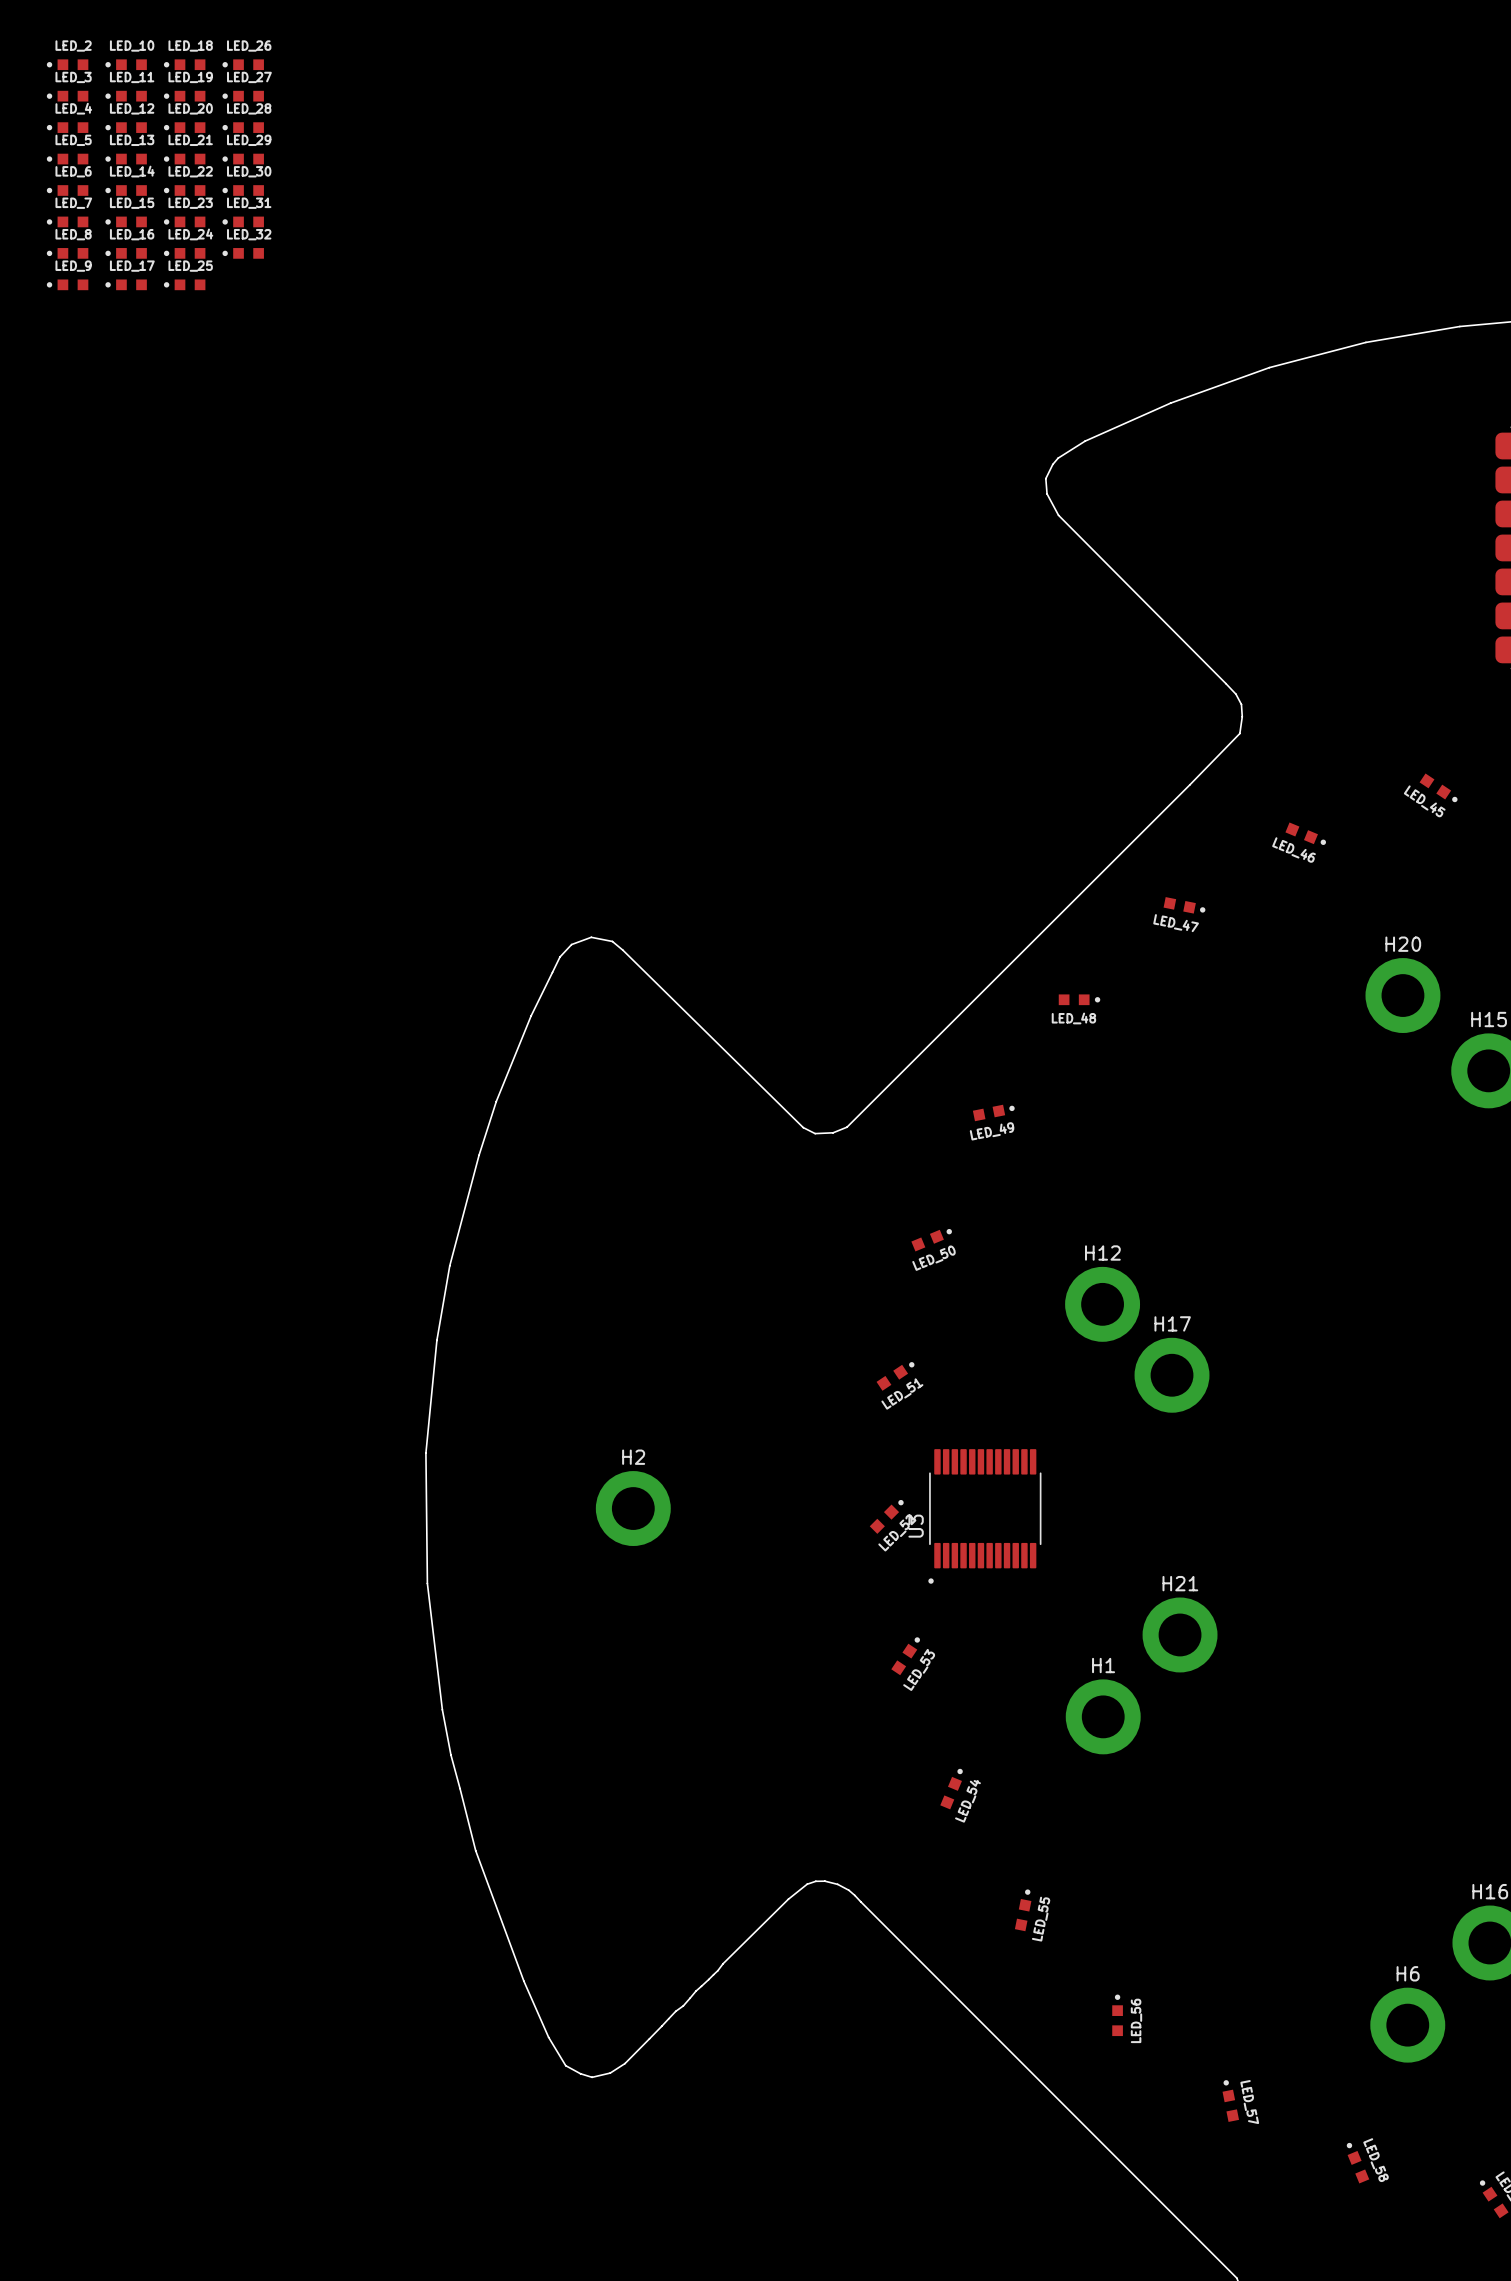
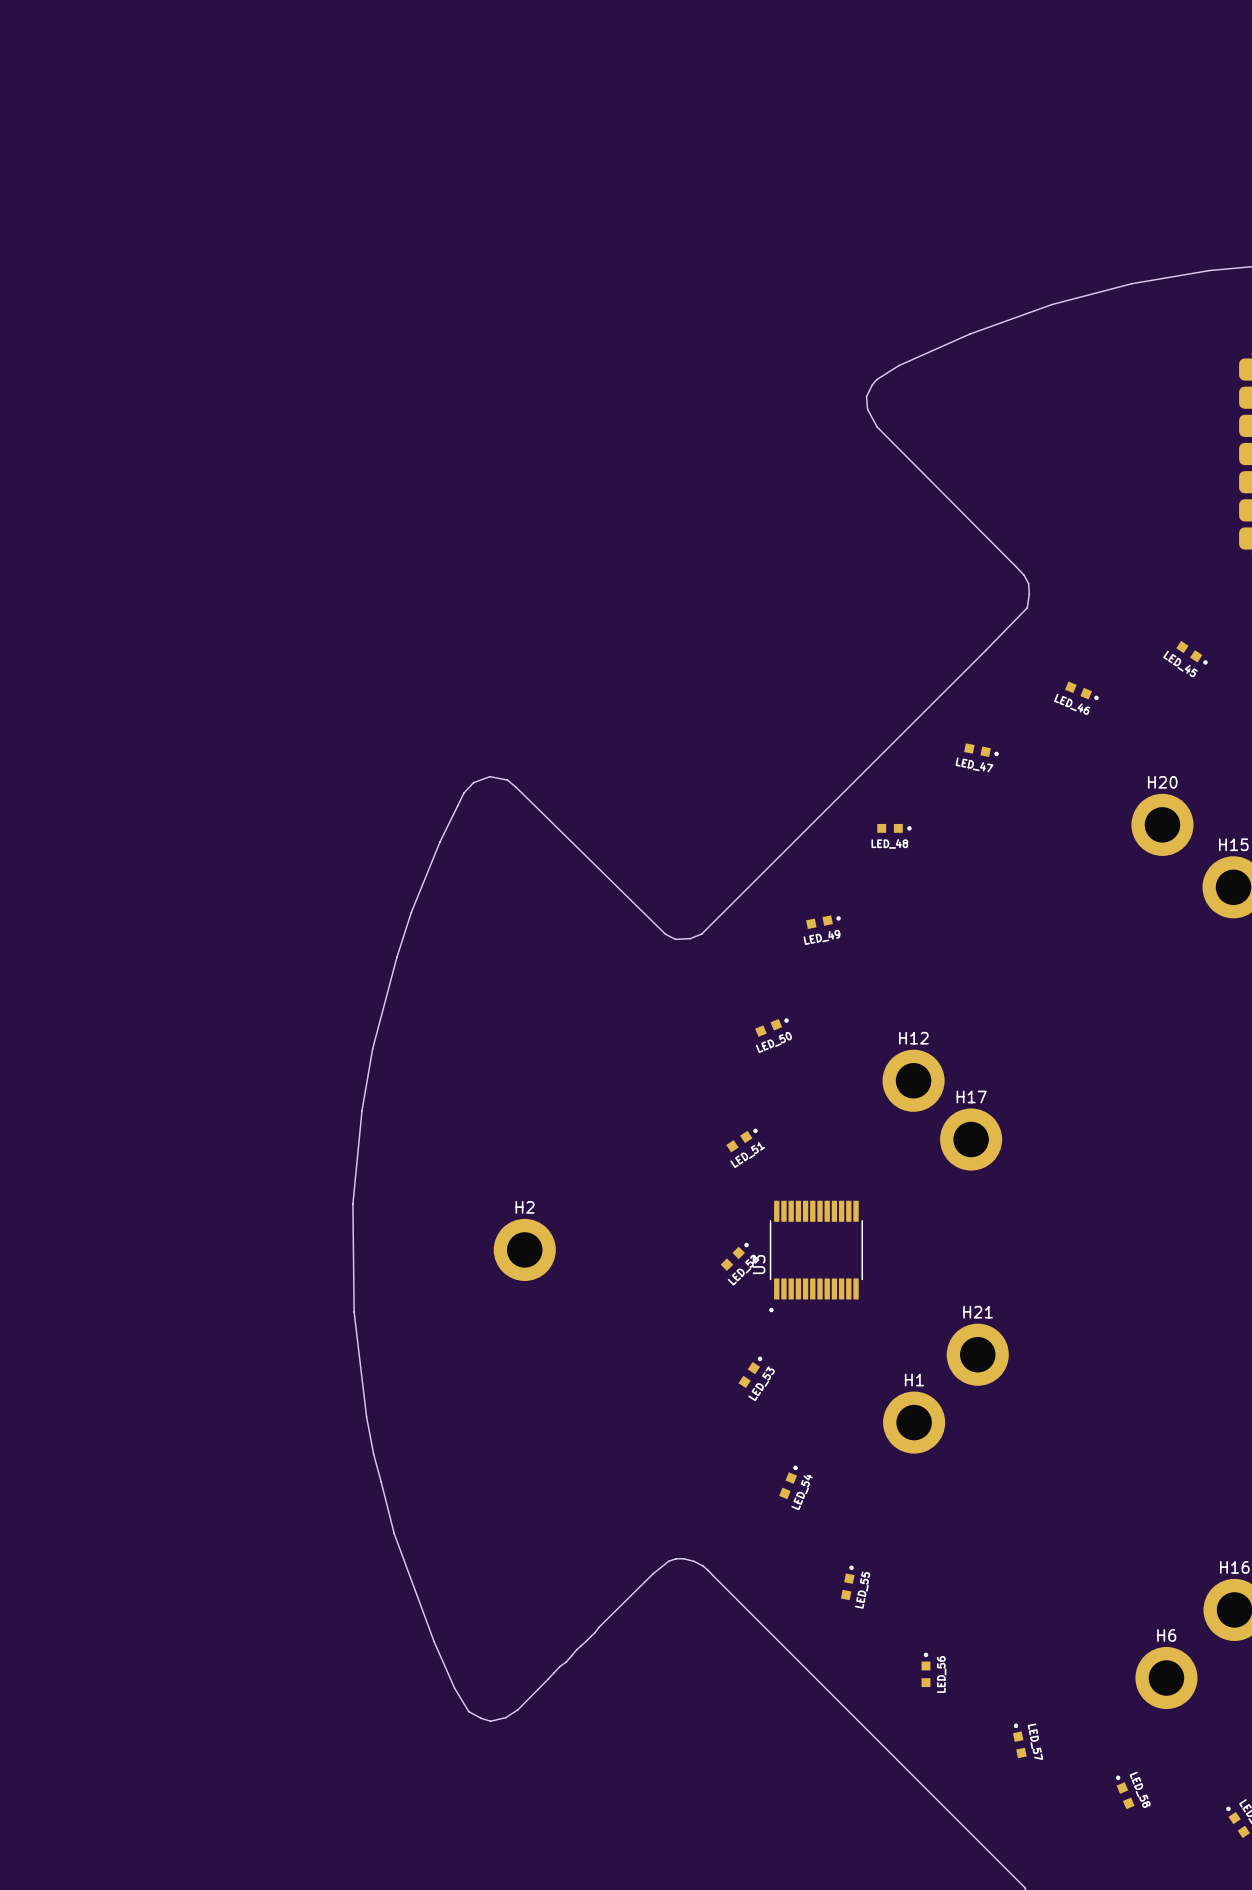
LED_2: (67, 64) -> none
LED_10: (126, 64) -> none
LED_18: (184, 64) -> none
LED_26: (243, 64) -> none
LED_3: (67, 96) -> none
LED_11: (126, 96) -> none
LED_19: (184, 96) -> none
LED_27: (243, 96) -> none
LED_4: (67, 127) -> none
LED_12: (126, 127) -> none
LED_20: (184, 127) -> none
LED_28: (243, 127) -> none
LED_5: (67, 159) -> none
LED_13: (126, 159) -> none
LED_21: (184, 159) -> none
LED_29: (243, 159) -> none
LED_6: (67, 190) -> none
LED_14: (126, 190) -> none
LED_22: (184, 190) -> none
LED_30: (243, 190) -> none
LED_7: (67, 221) -> none
LED_15: (126, 221) -> none
LED_23: (184, 221) -> none
LED_31: (243, 221) -> none
LED_8: (67, 253) -> none
LED_16: (126, 253) -> none
LED_24: (184, 253) -> none
LED_32: (243, 253) -> none
LED_9: (67, 284) -> none
LED_17: (126, 284) -> none
LED_25: (184, 284) -> none

